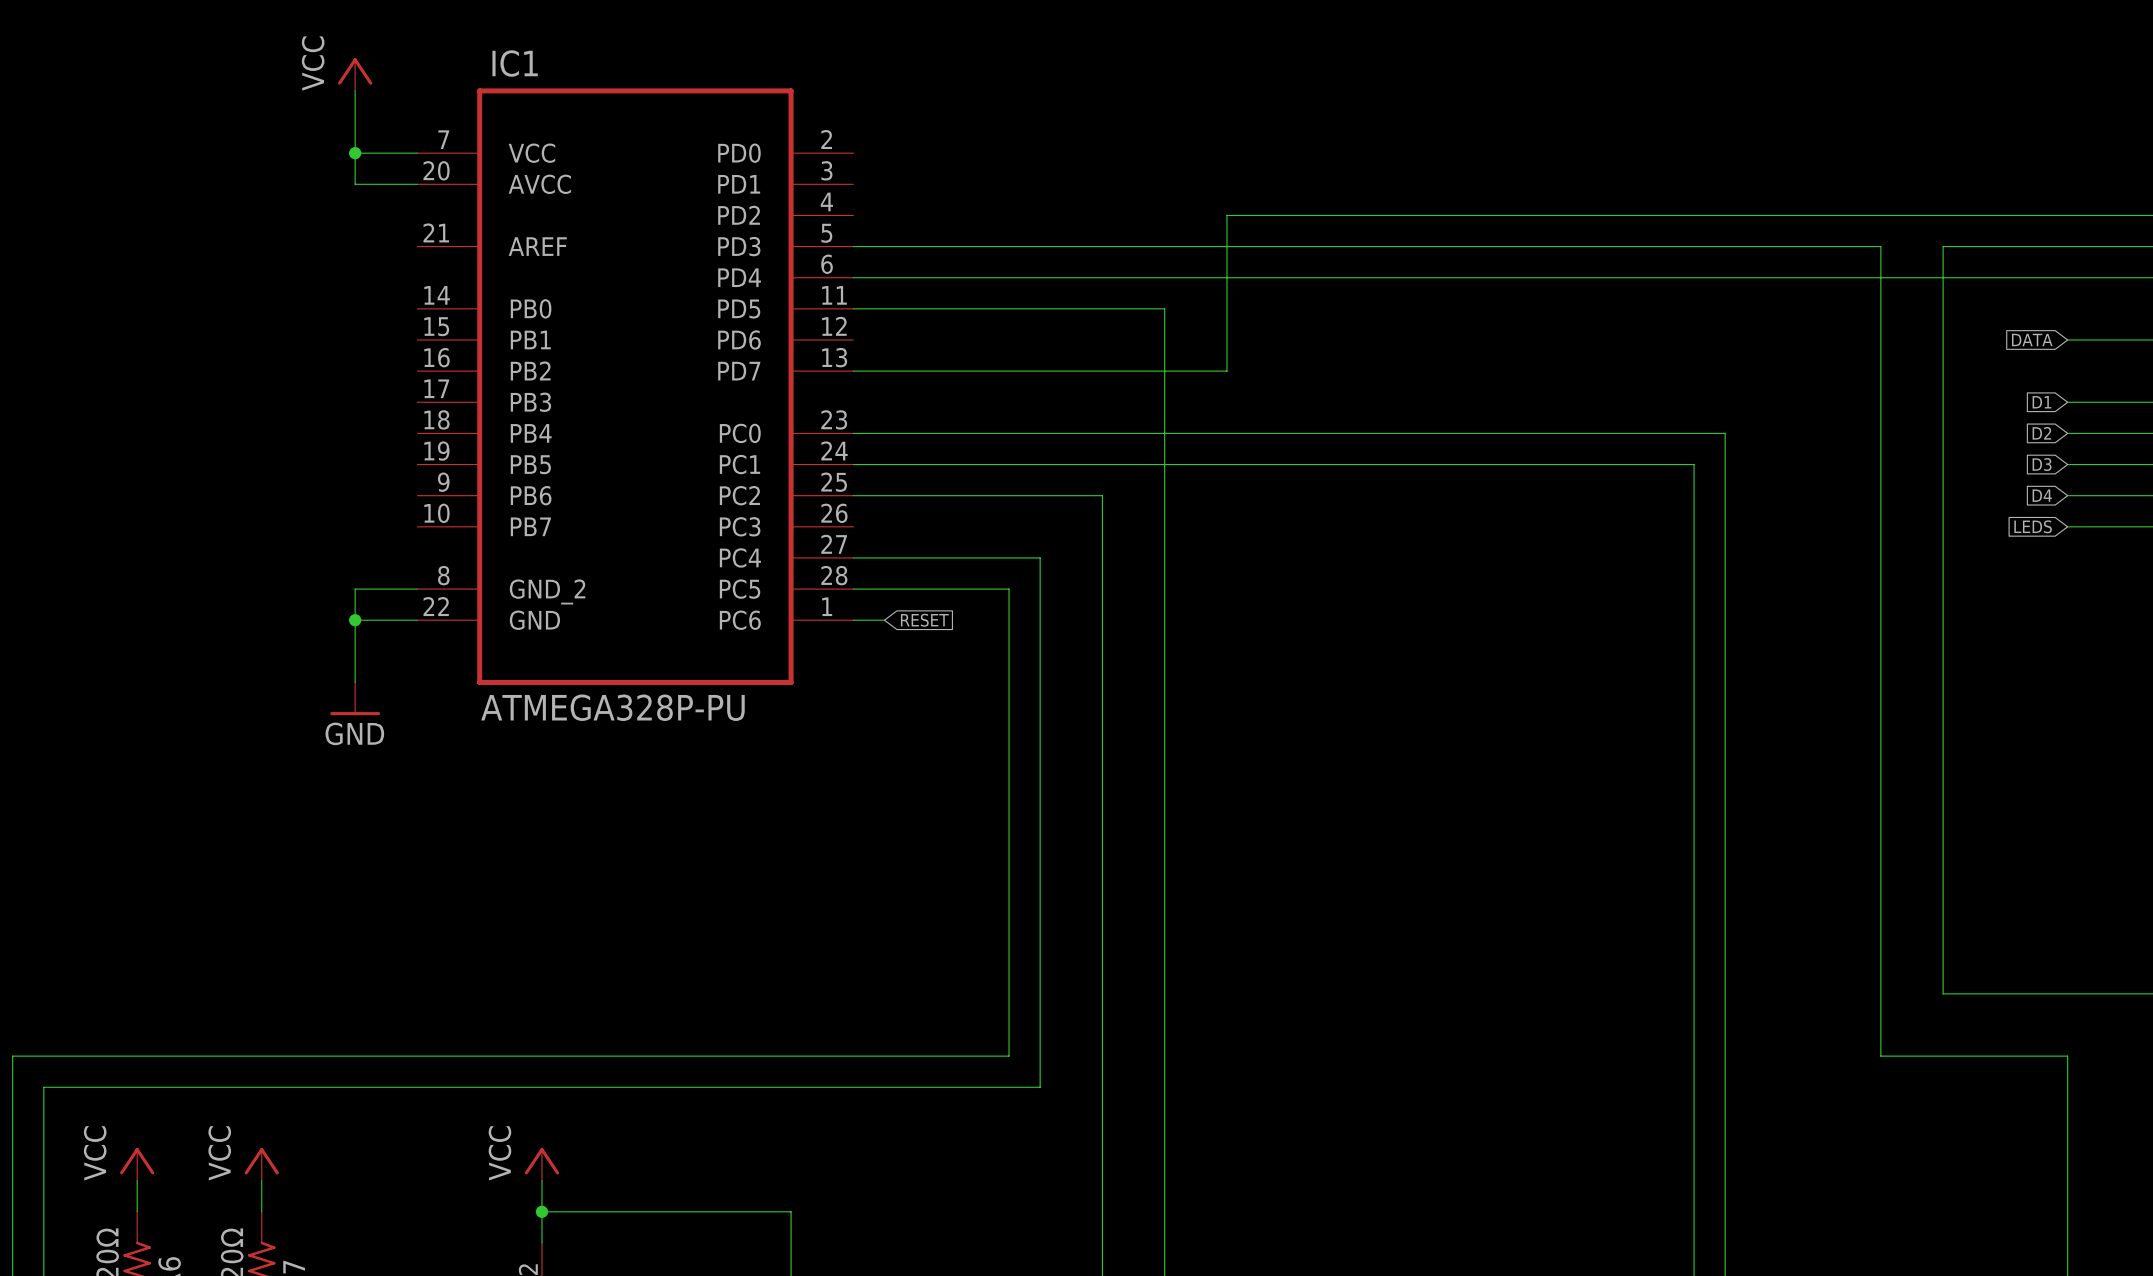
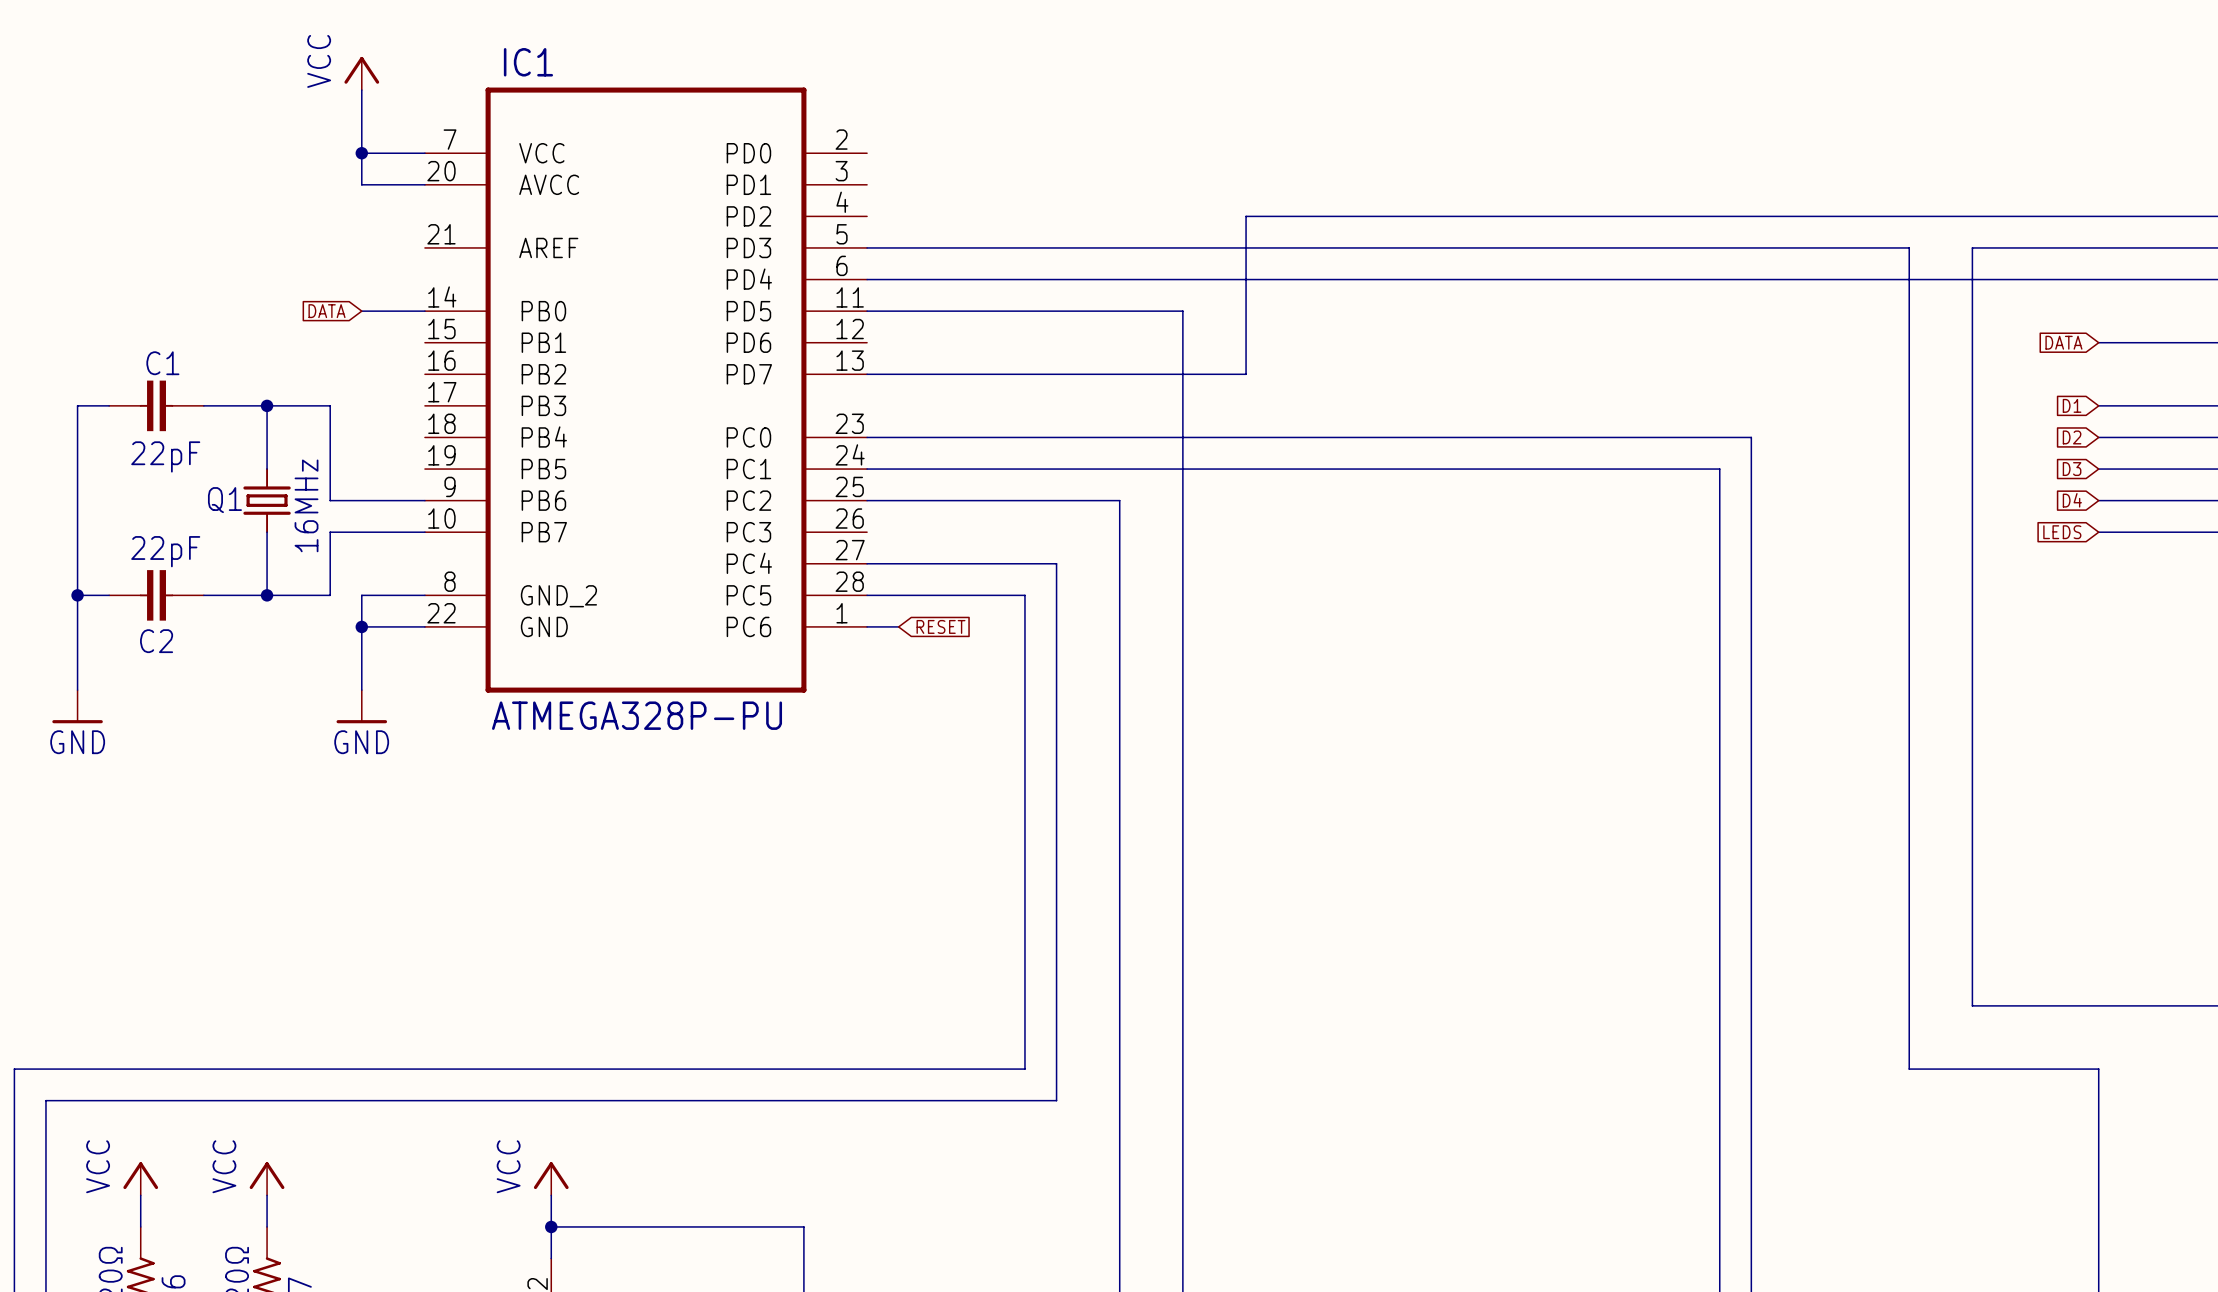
global label: none -> DATA (327, 311)
wire: none -> (361, 311) (424, 311)
wire: none -> (109, 405) (77, 405) (77, 690)
C1: none -> 22pF (156, 405)
wire: none -> (203, 405) (330, 405) (330, 500) (424, 500)
wire: none -> (267, 405) (267, 469)
junction: none -> (267, 405)
Q1: none -> 16MHz (267, 500)
wire: none -> (267, 532) (267, 595)
wire: none -> (424, 532) (330, 532) (330, 595) (203, 595)
wire: none -> (77, 595) (109, 595)
junction: none -> (77, 595)
C2: none -> 22pF (156, 595)
junction: none -> (267, 595)
power symbol: none -> GND (77, 706)

